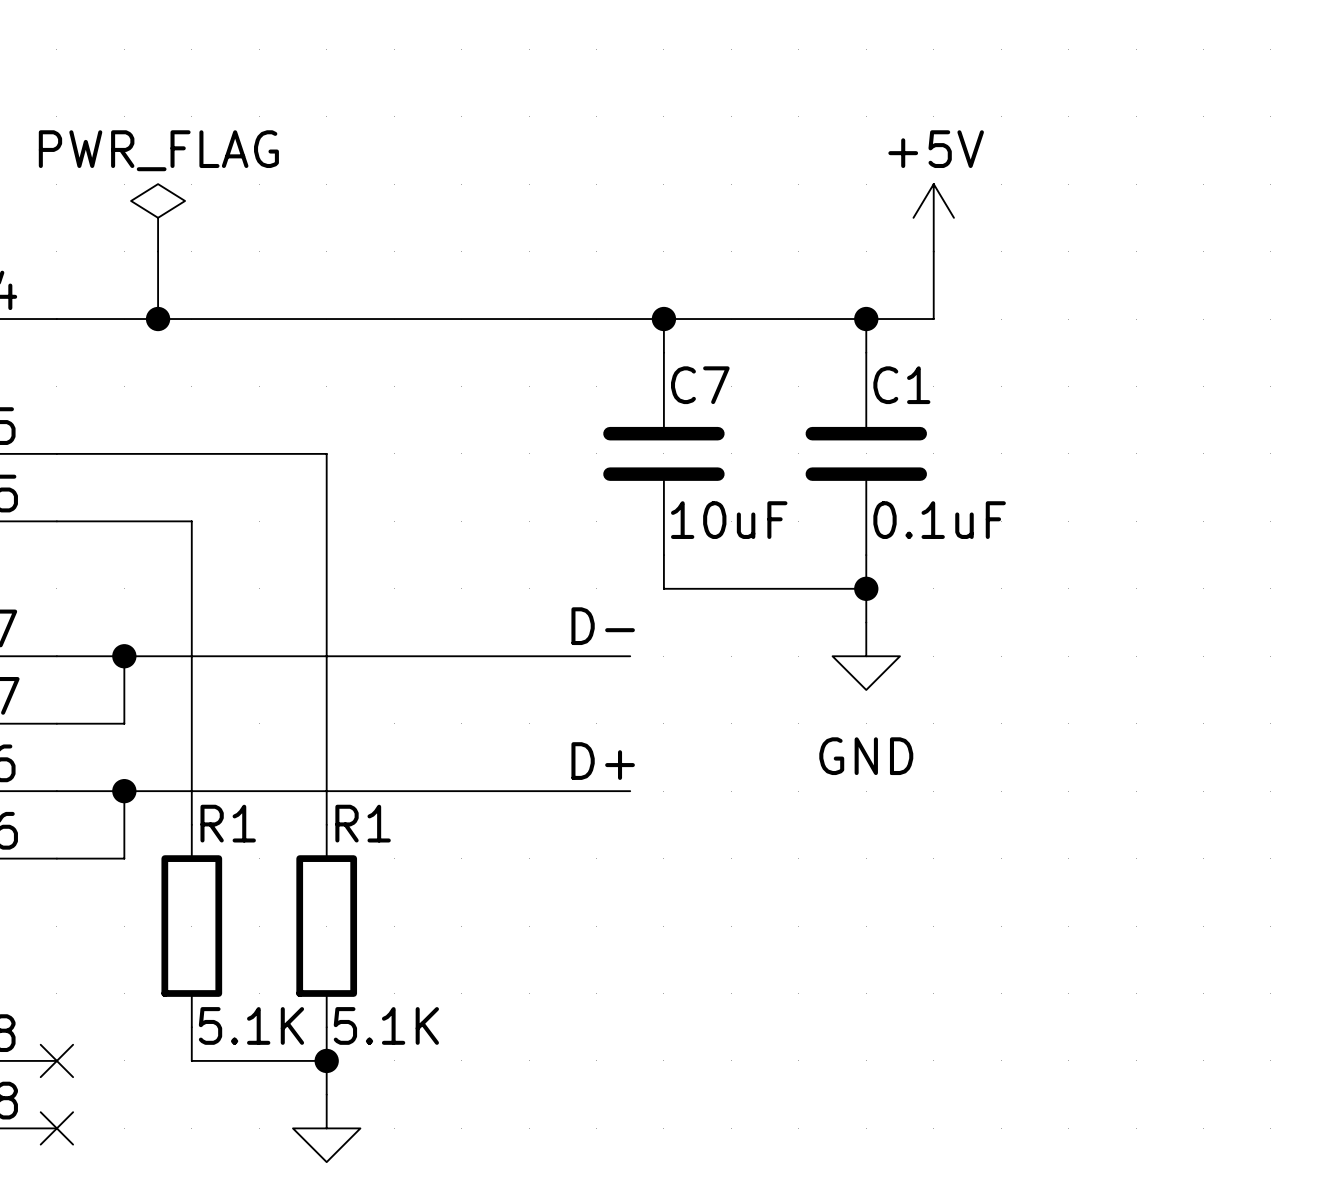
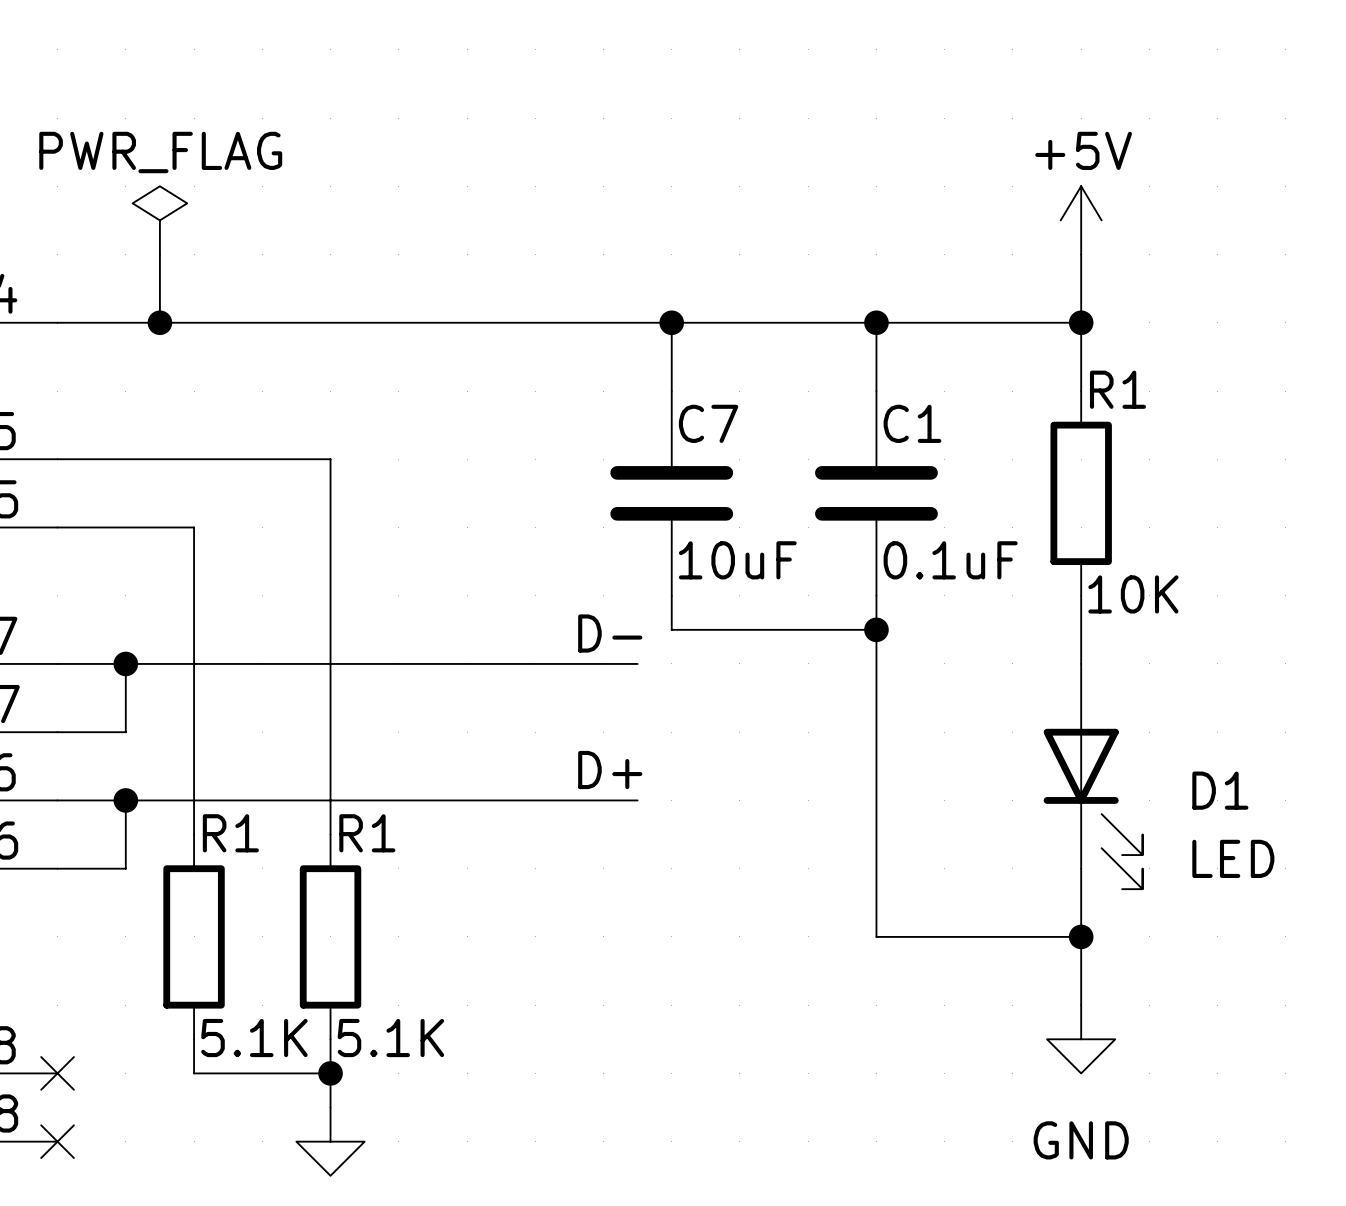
power symbol position: +5V (933, 217) -> +5V (1081, 220)
wire: (933, 251) (933, 319) -> (1081, 322) (944, 322)
wire: none -> (1081, 254) (1081, 391)
junction: none -> (1081, 322)
C7 position: (663, 453) -> (671, 493)
C1 position: (866, 453) -> (876, 493)
R1: none -> 10K (1081, 493)
wire: (663, 555) (663, 588) (866, 588) (866, 555) -> none
wire: none -> (671, 595) (671, 629) (876, 629) (876, 936) (1081, 936)
junction position: (866, 588) -> (876, 629)
wire: none -> (1081, 595) (1081, 663)
power symbol position: GND (866, 656) -> GND (1081, 1039)
D1: none -> LED (1093, 776)
wire: none -> (1081, 868) (1081, 1005)
junction: none -> (1081, 936)

